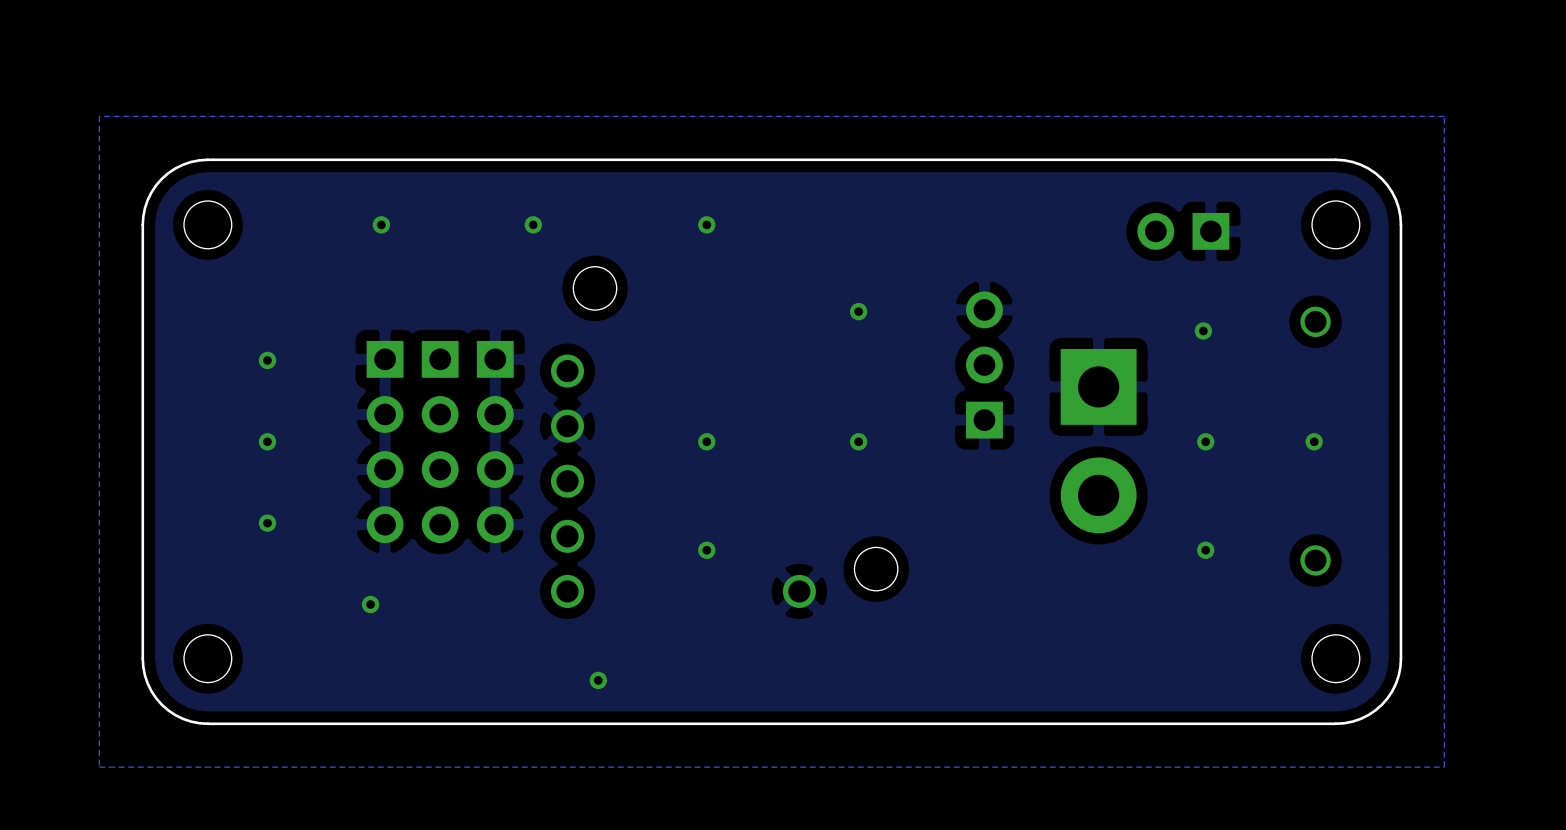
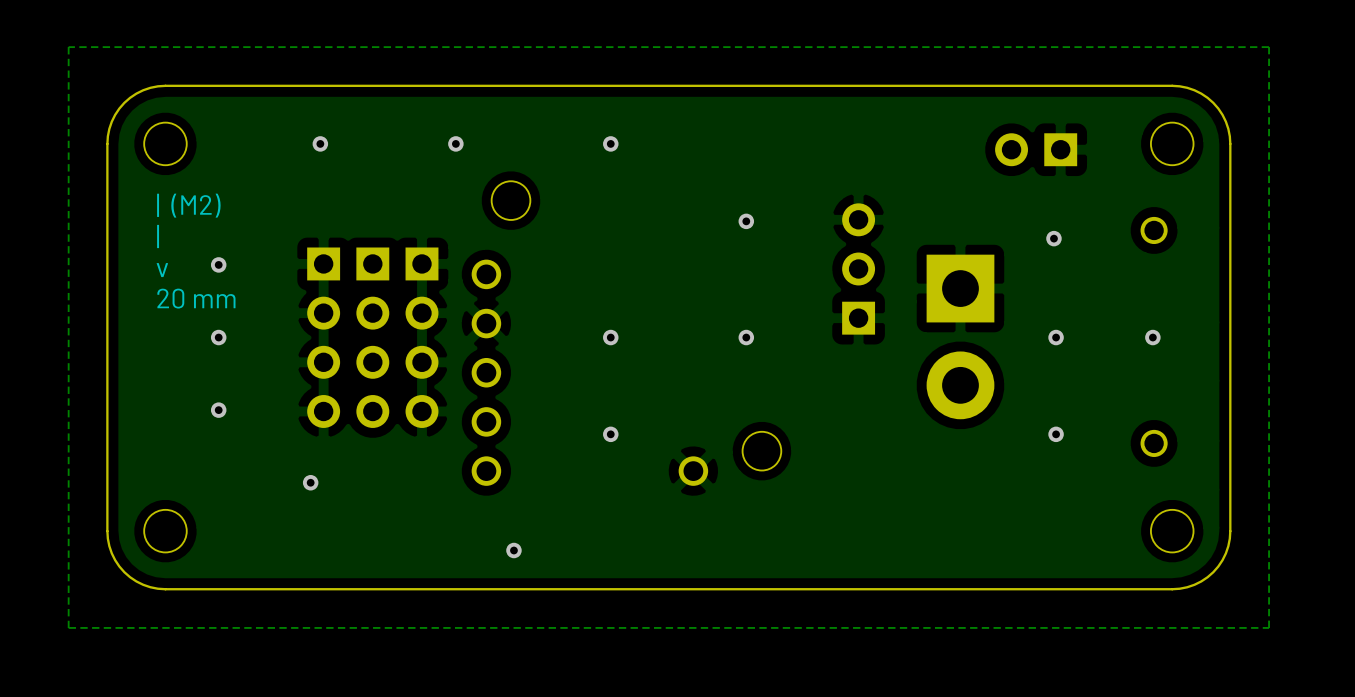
text: none -> | (M2) (188, 205)
text: none -> | (158, 236)
text: none -> v (162, 270)
text: none -> 20 mm (196, 298)

